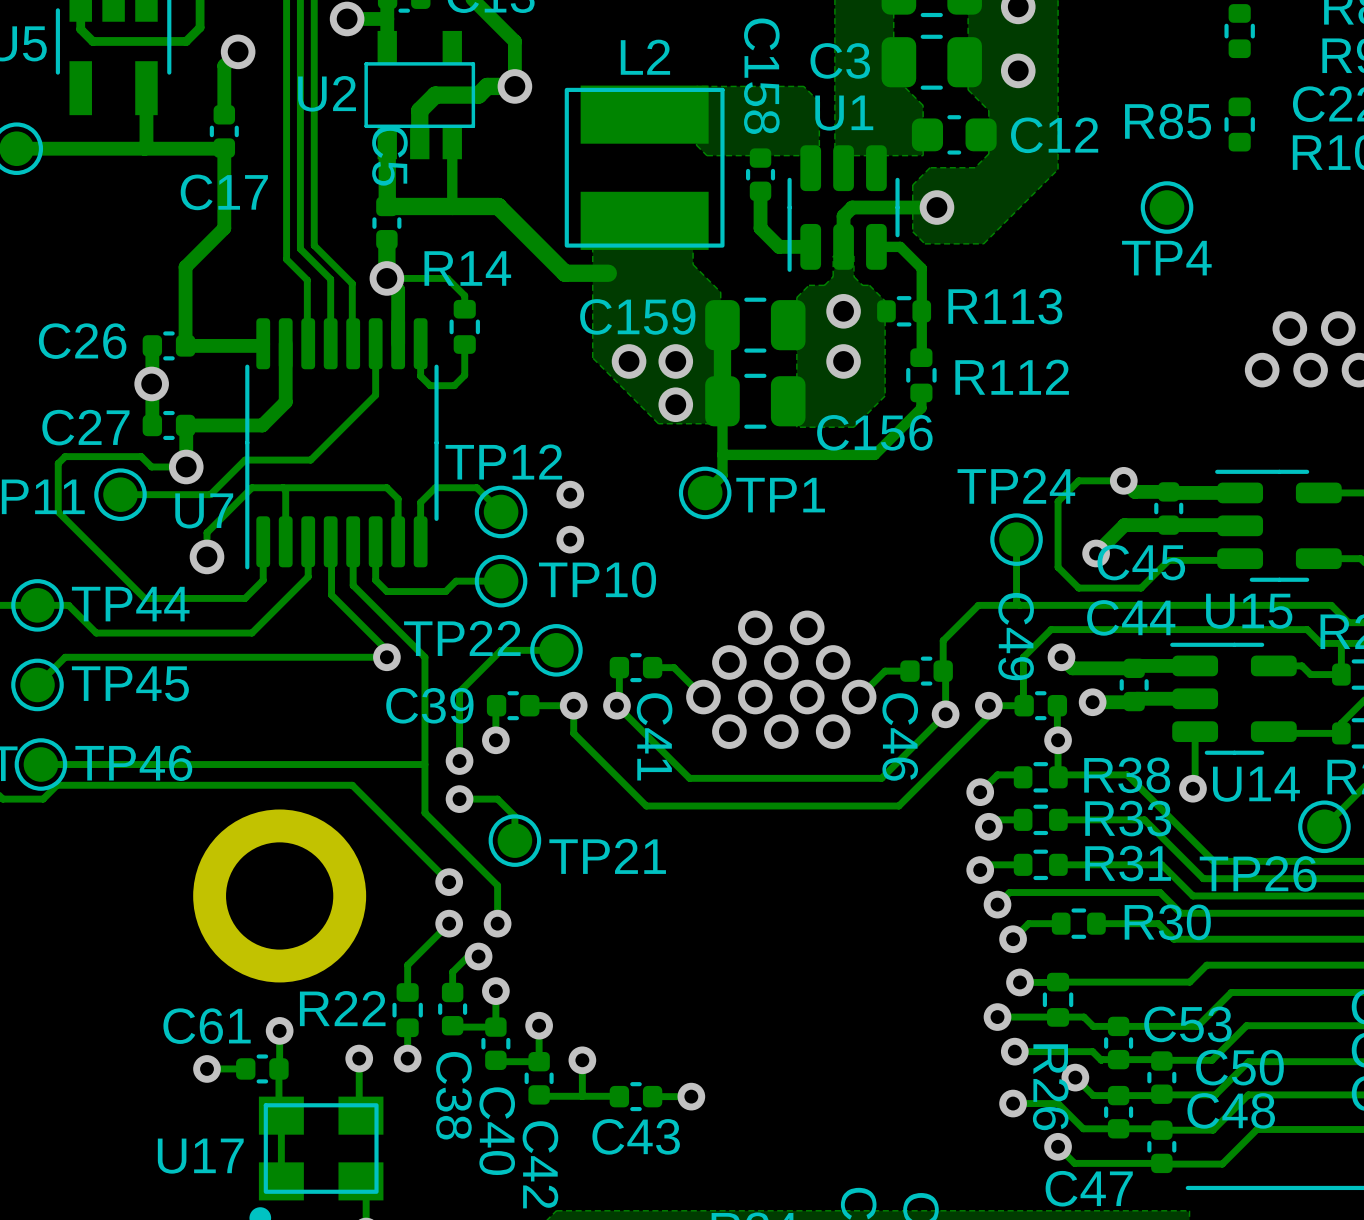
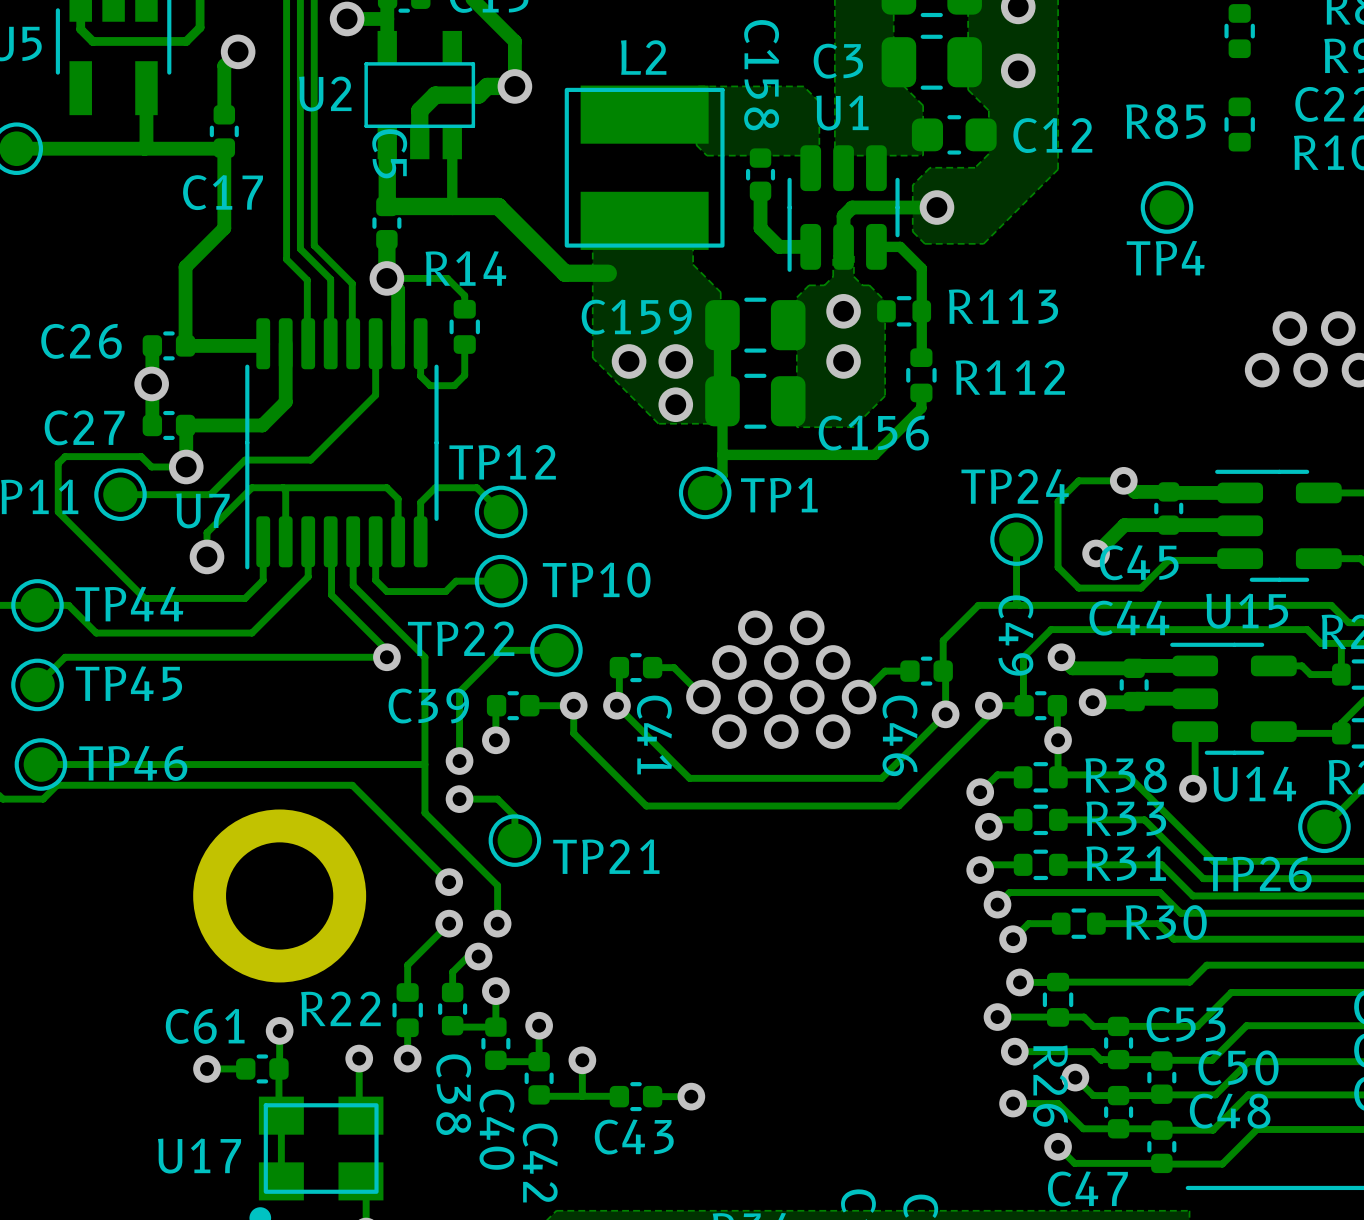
via: (570, 494) -> none
via: (570, 539) -> none

